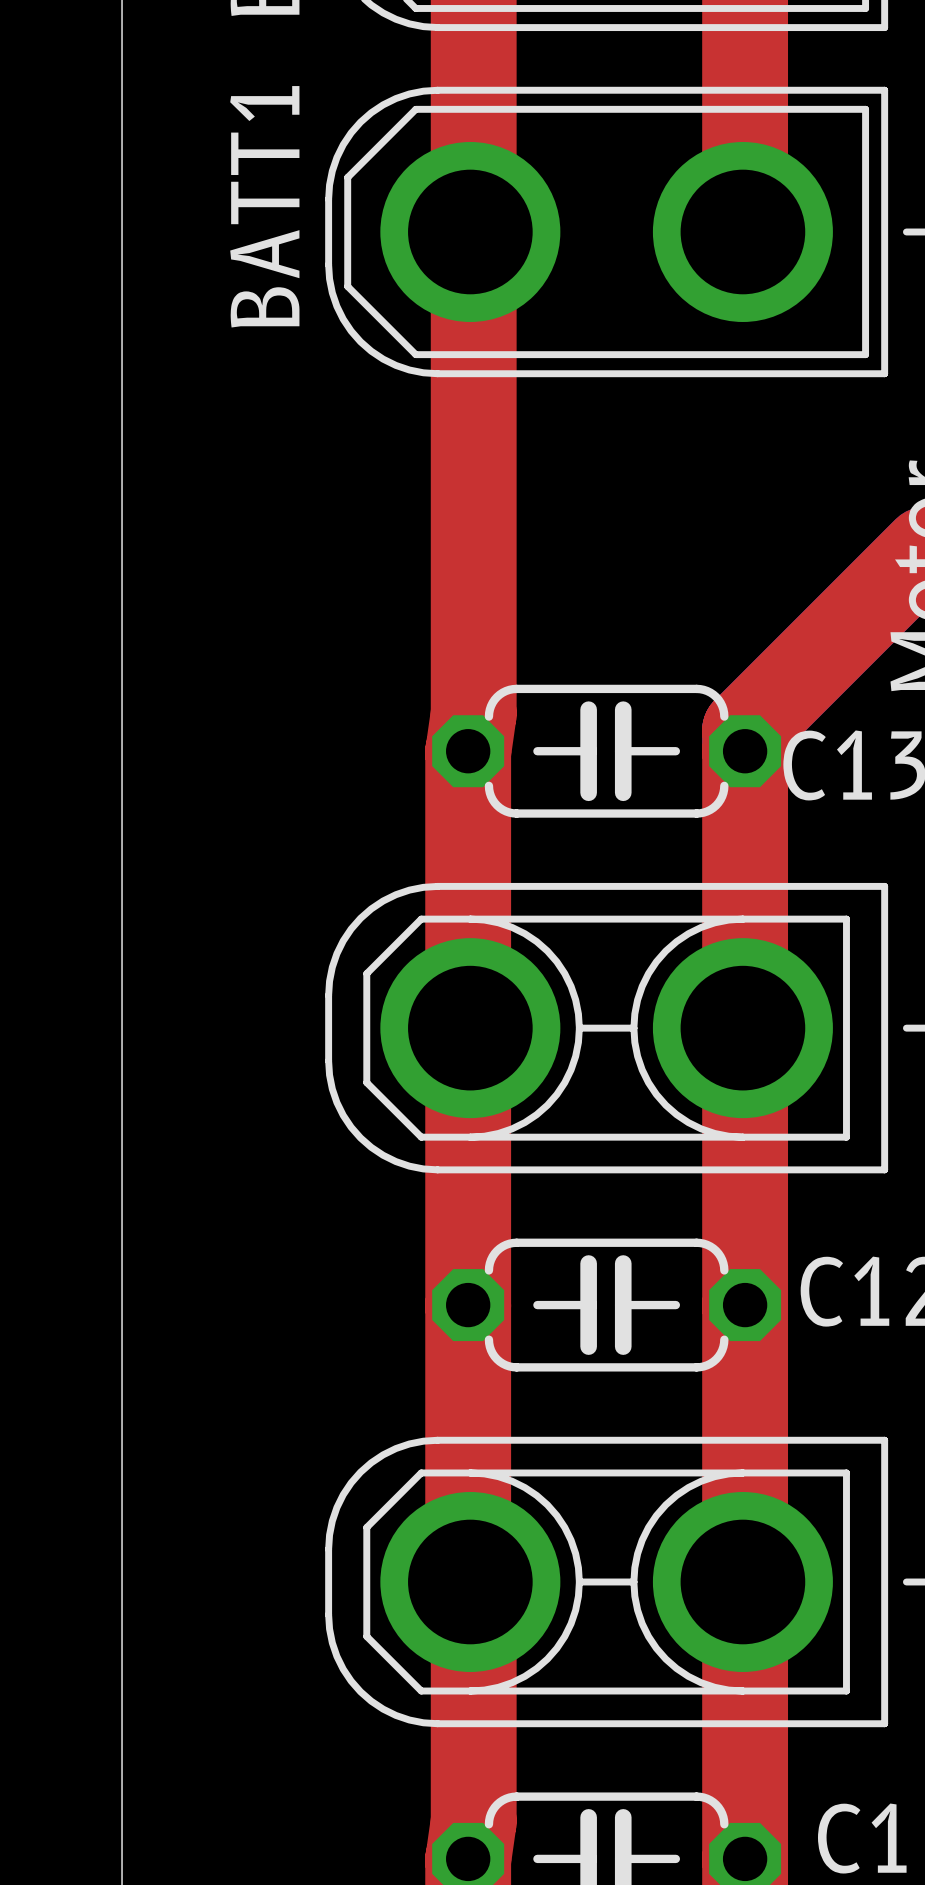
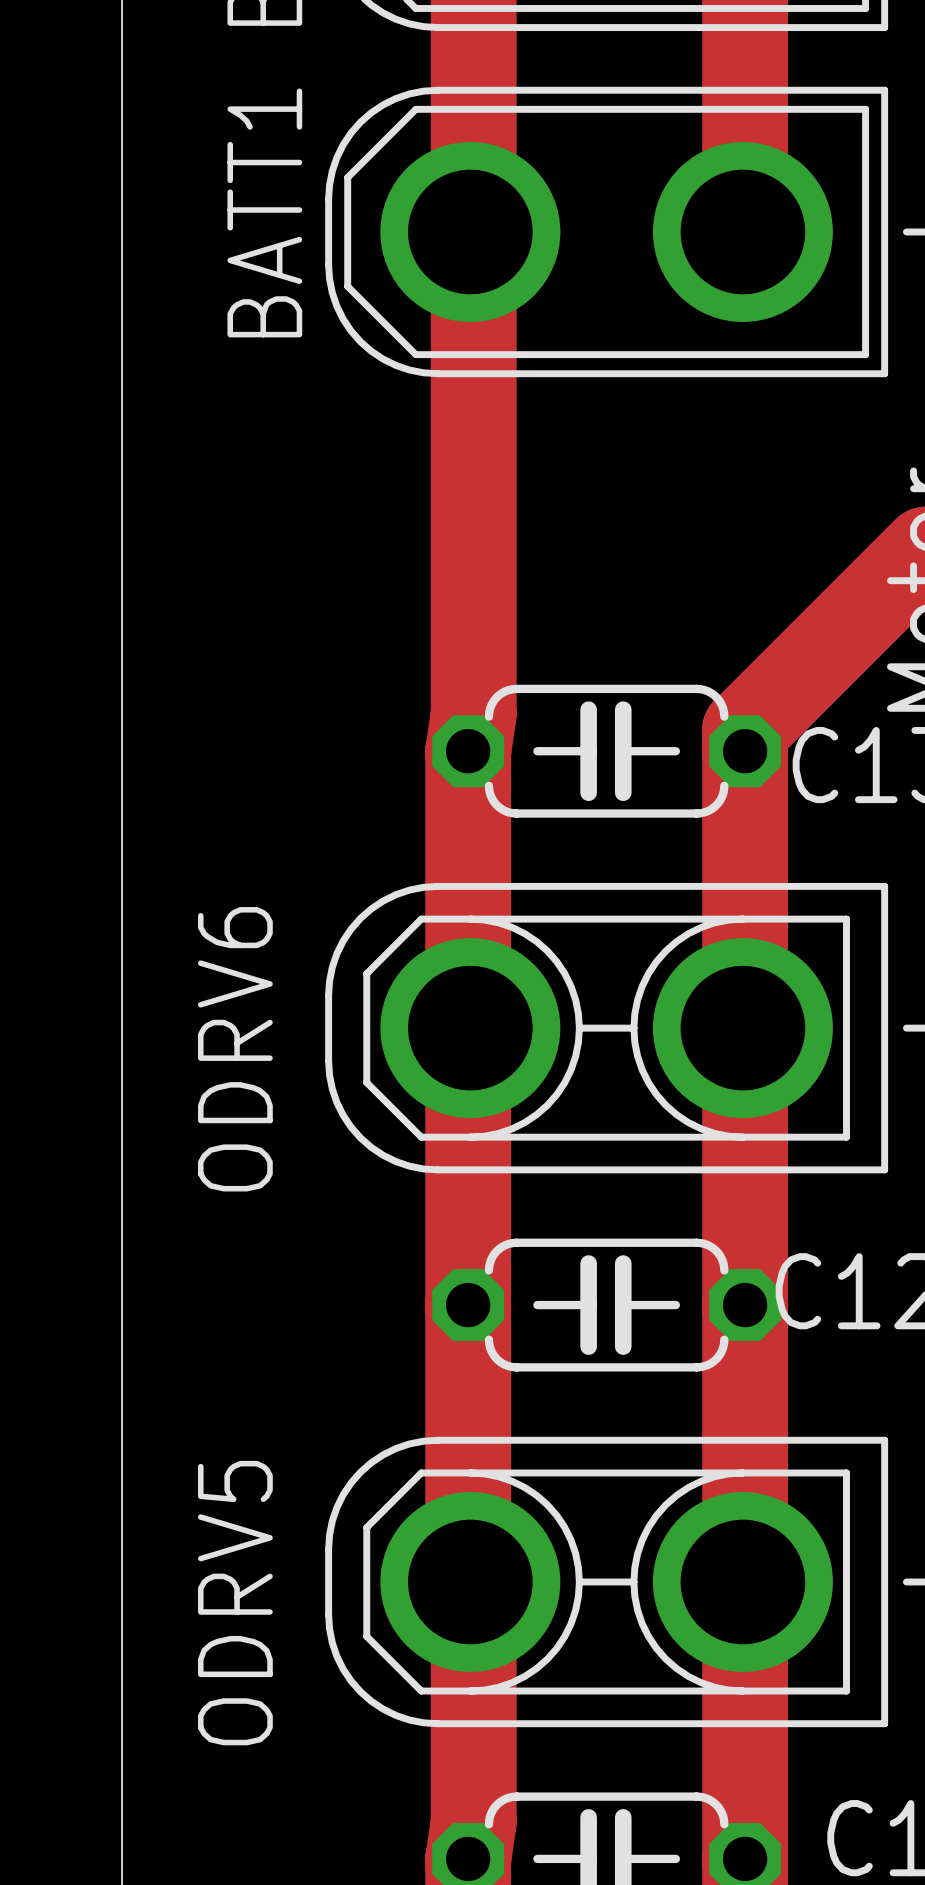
part value: none -> ODRV6 (235, 1049)
part value: none -> ODRV5 (235, 1603)

